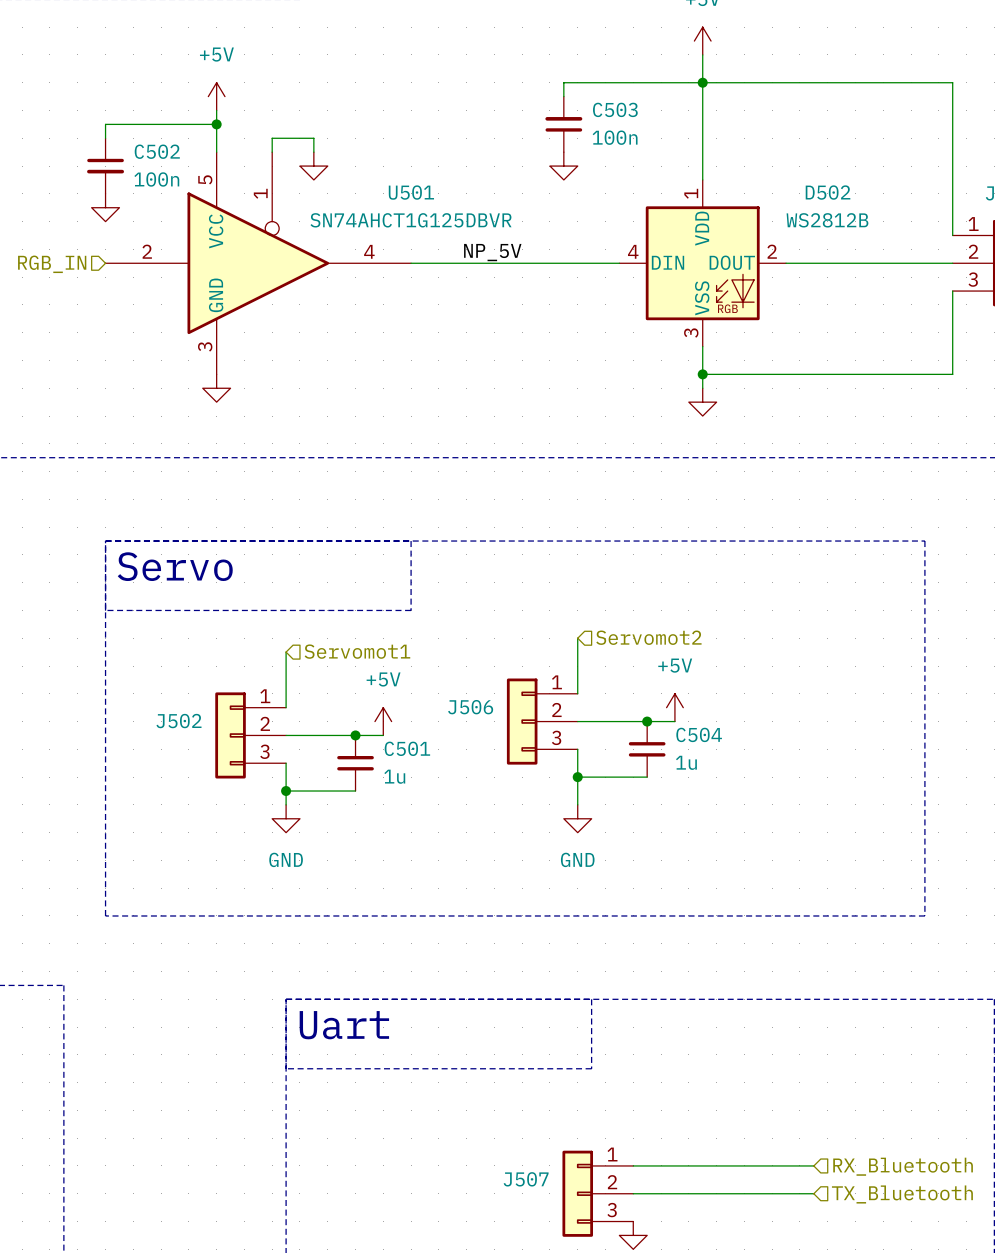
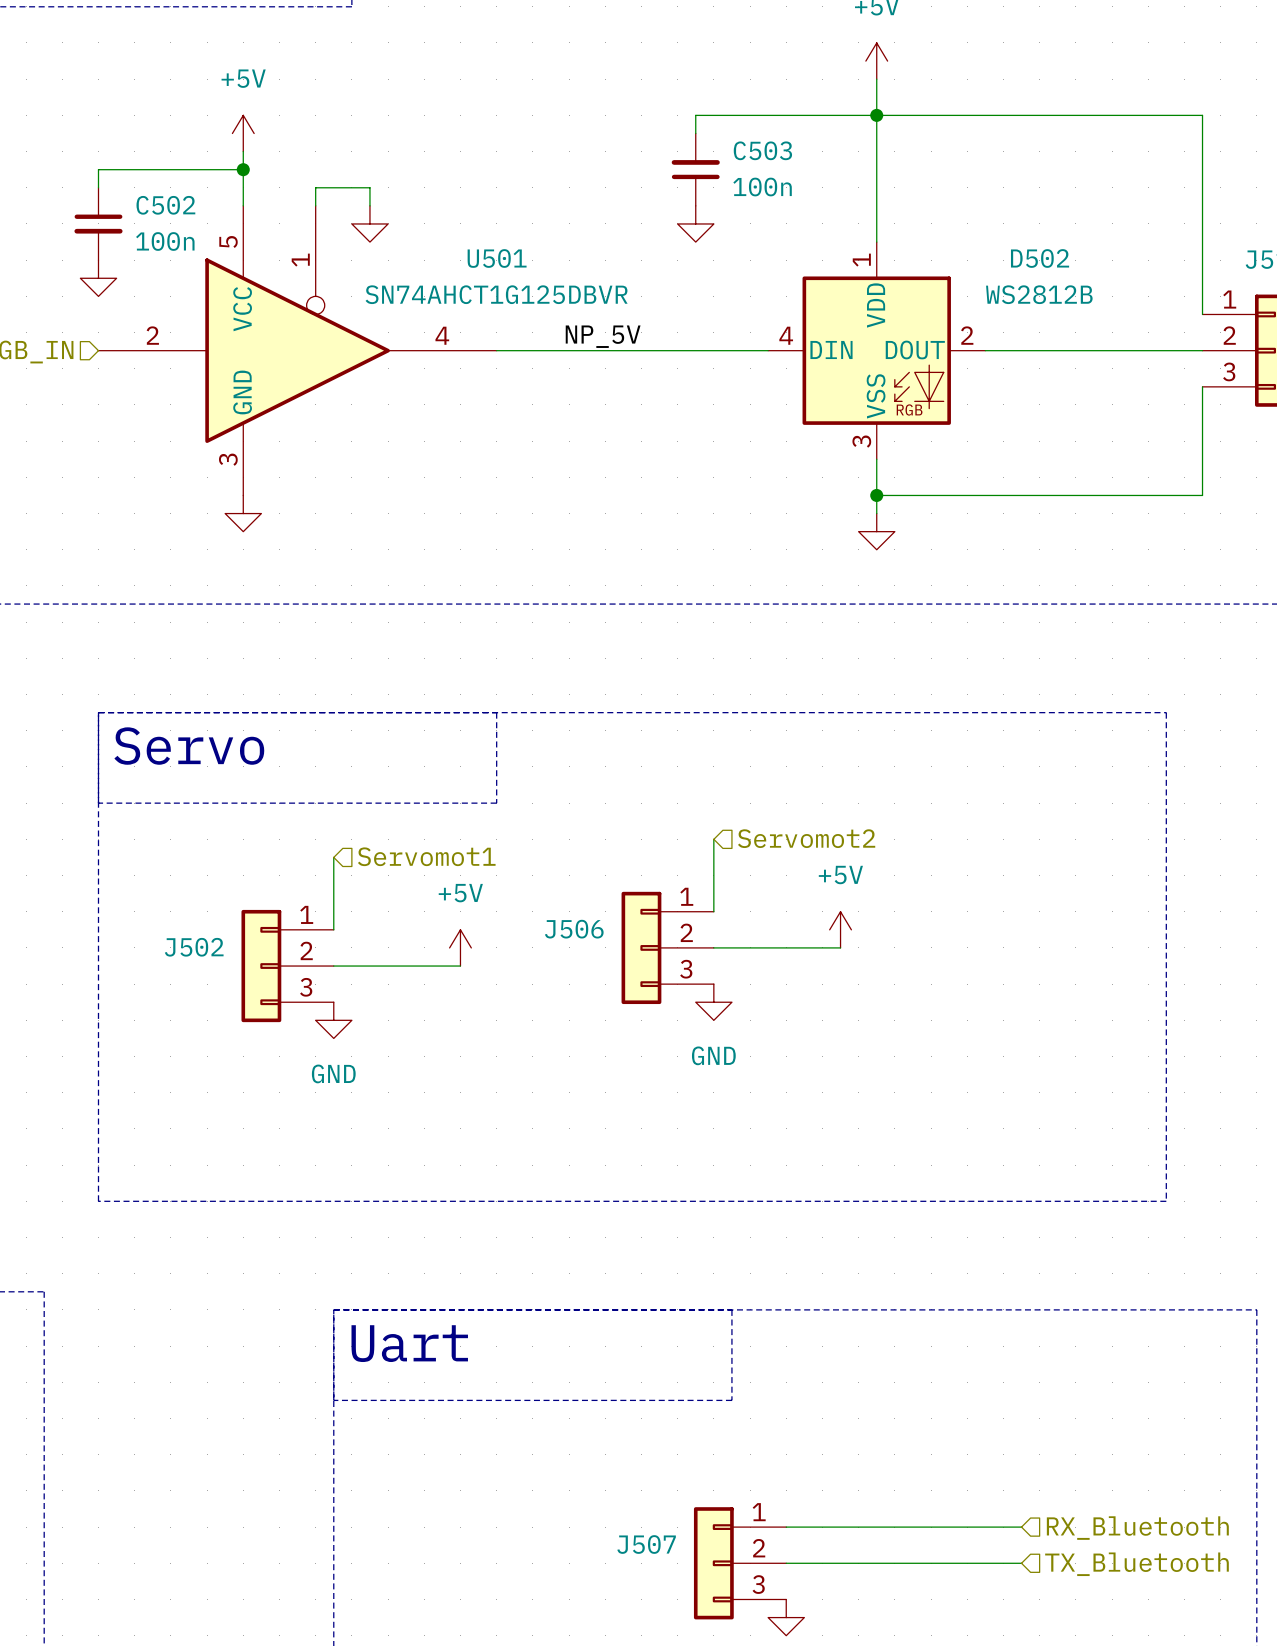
junction: (647, 721) -> none
junction: (355, 735) -> none
wire: (577, 749) (577, 804) -> none
C504: 1u (647, 749) -> none
wire: (286, 763) (286, 804) -> none
C501: 1u (355, 763) -> none
wire: (577, 777) (647, 777) -> none
junction: (577, 777) -> none
wire: (286, 791) (355, 791) -> none
junction: (286, 791) -> none
power symbol position: GND (286, 818) -> GND (333, 1020)
power symbol position: GND (577, 818) -> GND (713, 1002)

